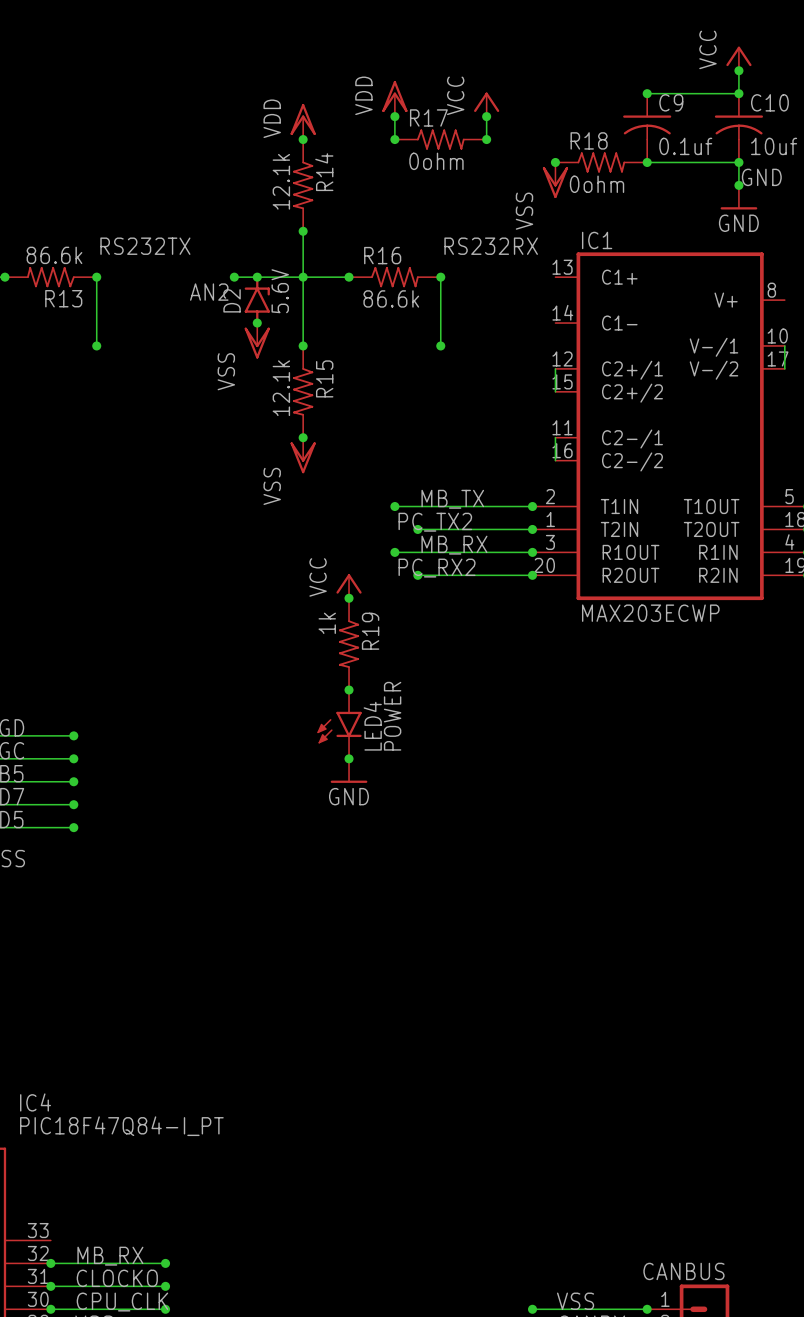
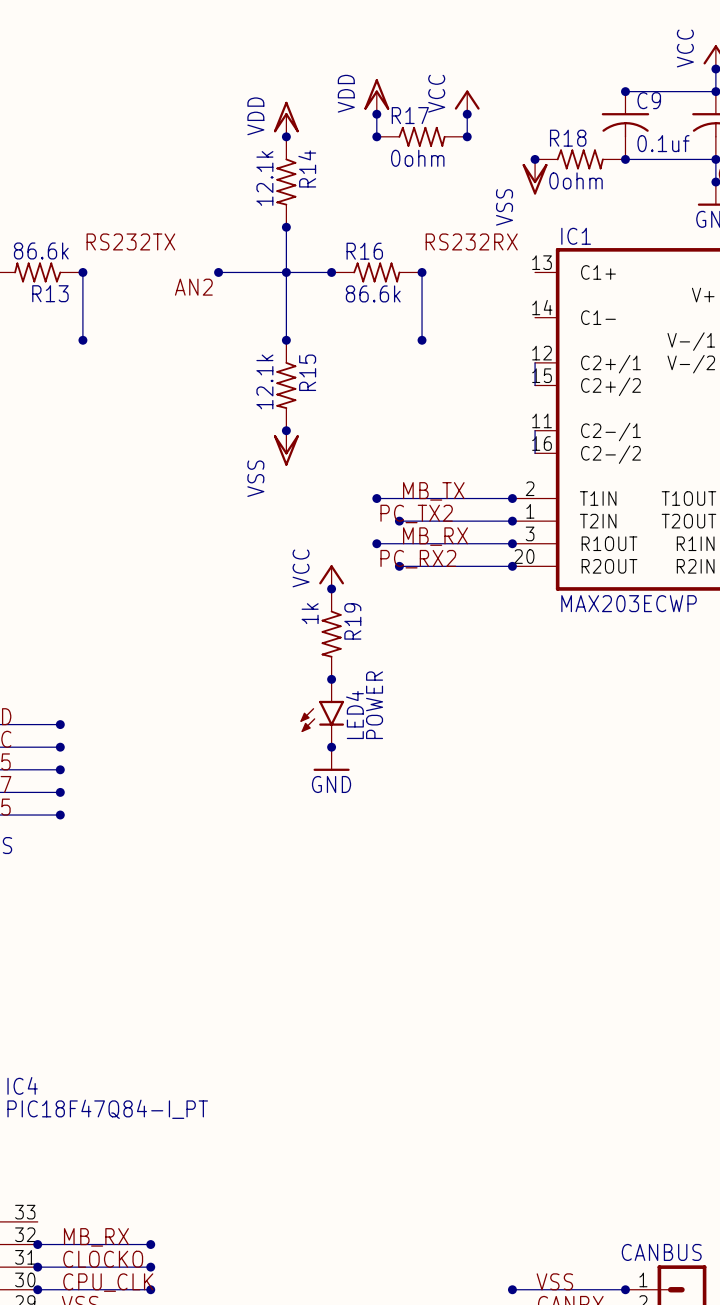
junction: (257, 277) -> none
D2: 5.6V (257, 300) -> none
junction: (257, 323) -> none
power symbol: VSS (257, 340) -> none

